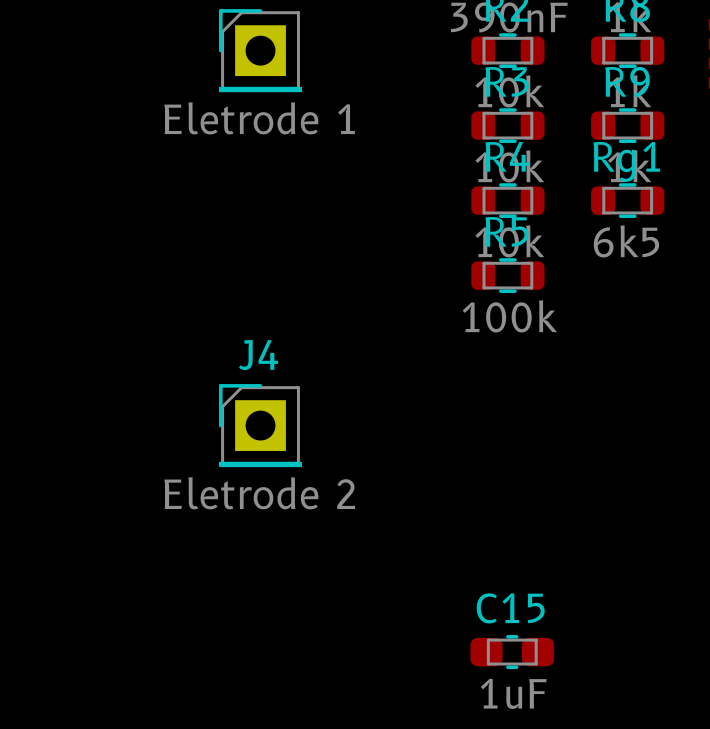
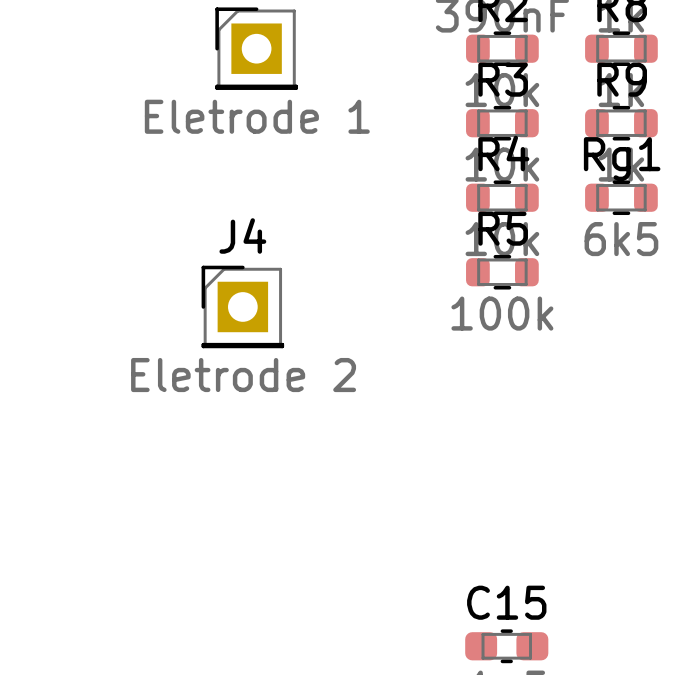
J4 position: (260, 425) -> (242, 306)

